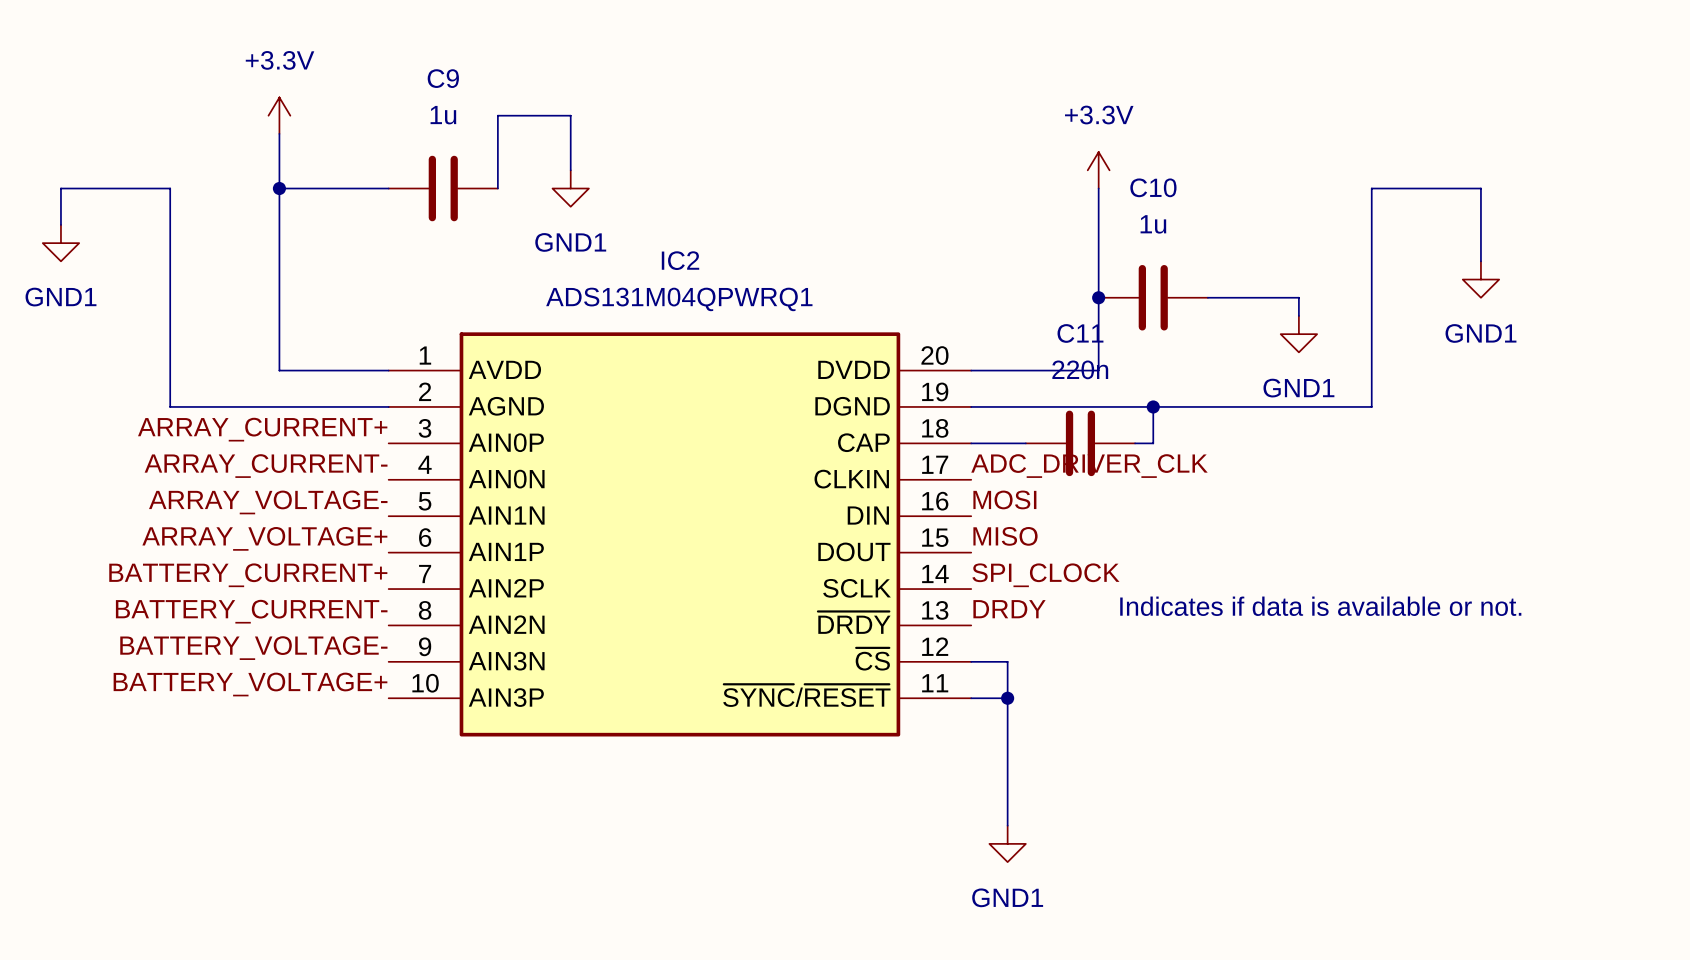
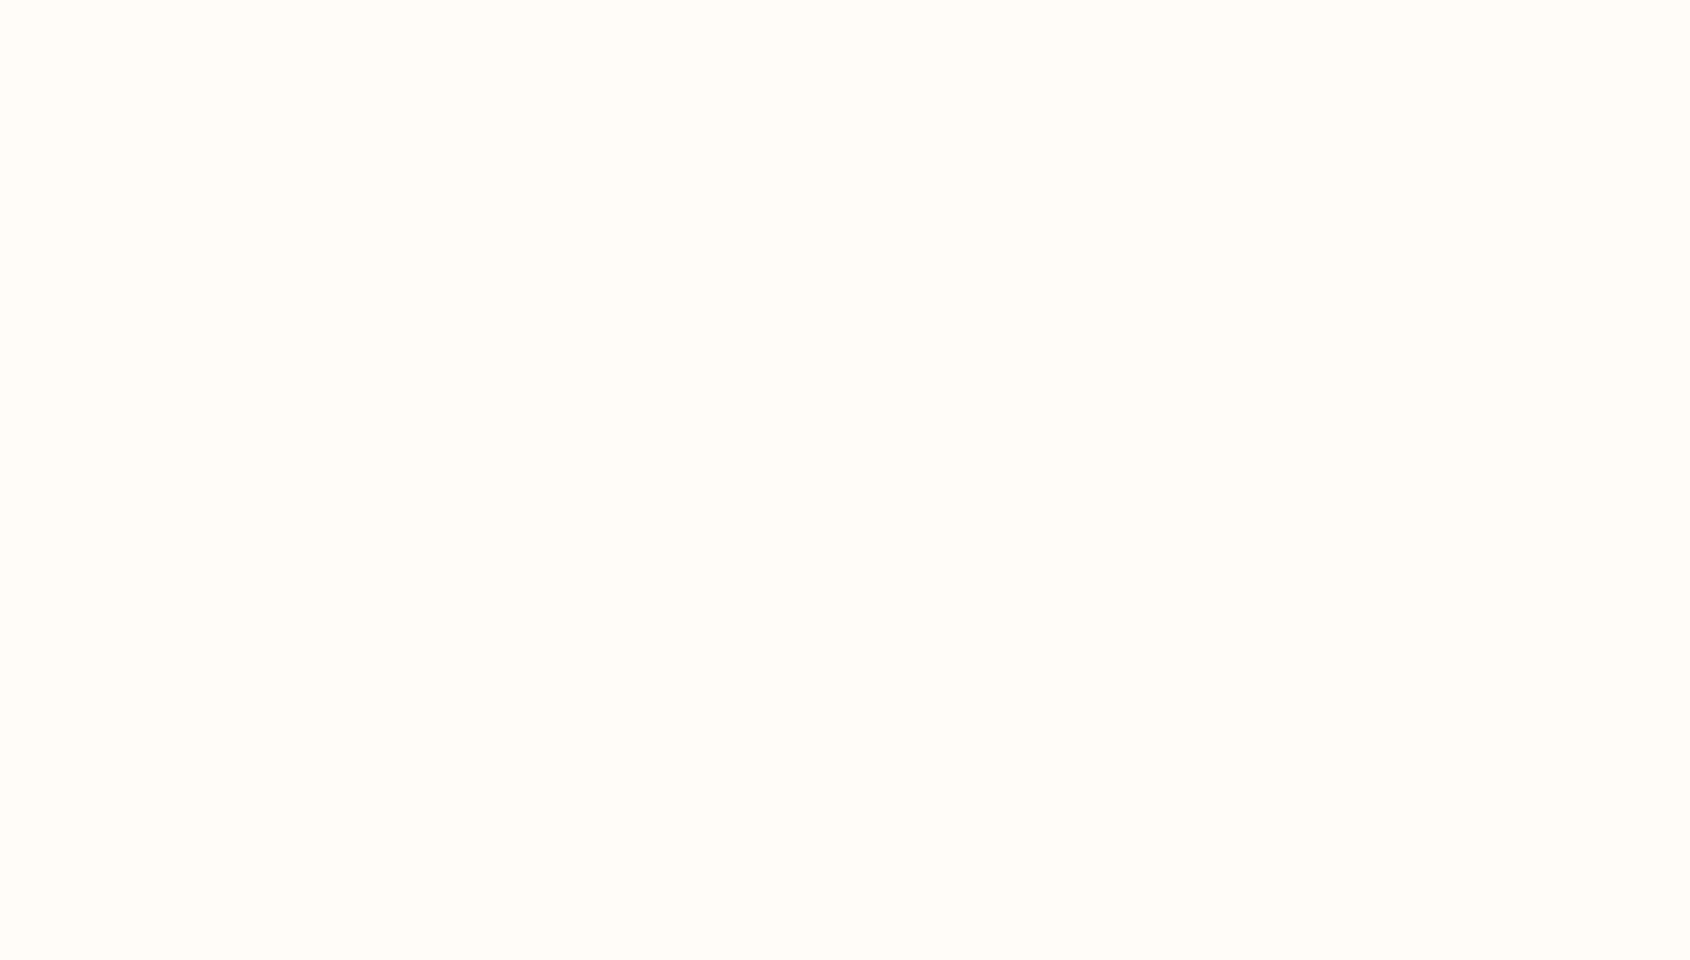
power symbol: +3.3V (279, 115) -> none
wire: (279, 133) (279, 370) (388, 370) -> none
wire: (570, 170) (570, 115) (497, 115) (497, 188) -> none
power symbol: +3.3V (1098, 170) -> none
wire: (279, 188) (388, 188) -> none
junction: (279, 188) -> none
C9: 1u (443, 188) -> none
power symbol: GND1 (570, 188) -> none
wire: (1098, 188) (1098, 370) (971, 370) -> none
wire: (60, 224) (60, 188) (170, 188) (170, 406) (388, 406) -> none
power symbol: GND1 (60, 243) -> none
wire: (1480, 261) (1480, 188) (1371, 188) (1371, 406) (971, 406) -> none
power symbol: GND1 (1480, 279) -> none
junction: (1098, 297) -> none
C10: 1u (1153, 297) -> none
wire: (1207, 297) (1298, 297) (1298, 315) -> none
power symbol: GND1 (1298, 334) -> none
wire: (1153, 406) (1153, 443) (1135, 443) -> none
junction: (1153, 406) -> none
label: ARRAY_CURRENT+ (262, 429) -> none
wire: (971, 443) (1025, 443) -> none
C11: 220n (1080, 443) -> none
label: ARRAY_CURRENT- (266, 466) -> none
label: ADC_DRIVER_CLK (1089, 466) -> none
label: MOSI (1004, 499) -> none
label: ARRAY_VOLTAGE- (268, 502) -> none
IC2: ADS131M04QPWRQ1 (679, 534) -> none
label: MISO (1005, 536) -> none
label: ARRAY_VOLTAGE+ (264, 538) -> none
label: BATTERY_CURRENT+ (248, 575) -> none
label: SPI_CLOCK (1045, 575) -> none
text: Indicates if data is available or not. (1320, 606) -> none
label: DRDY (1009, 609) -> none
label: BATTERY_CURRENT- (251, 611) -> none
label: BATTERY_VOLTAGE- (253, 648) -> none
wire: (971, 661) (1007, 661) (1007, 825) -> none
label: BATTERY_VOLTAGE+ (250, 684) -> none
wire: (971, 698) (1007, 698) -> none
junction: (1007, 698) -> none
power symbol: GND1 (1007, 843) -> none

